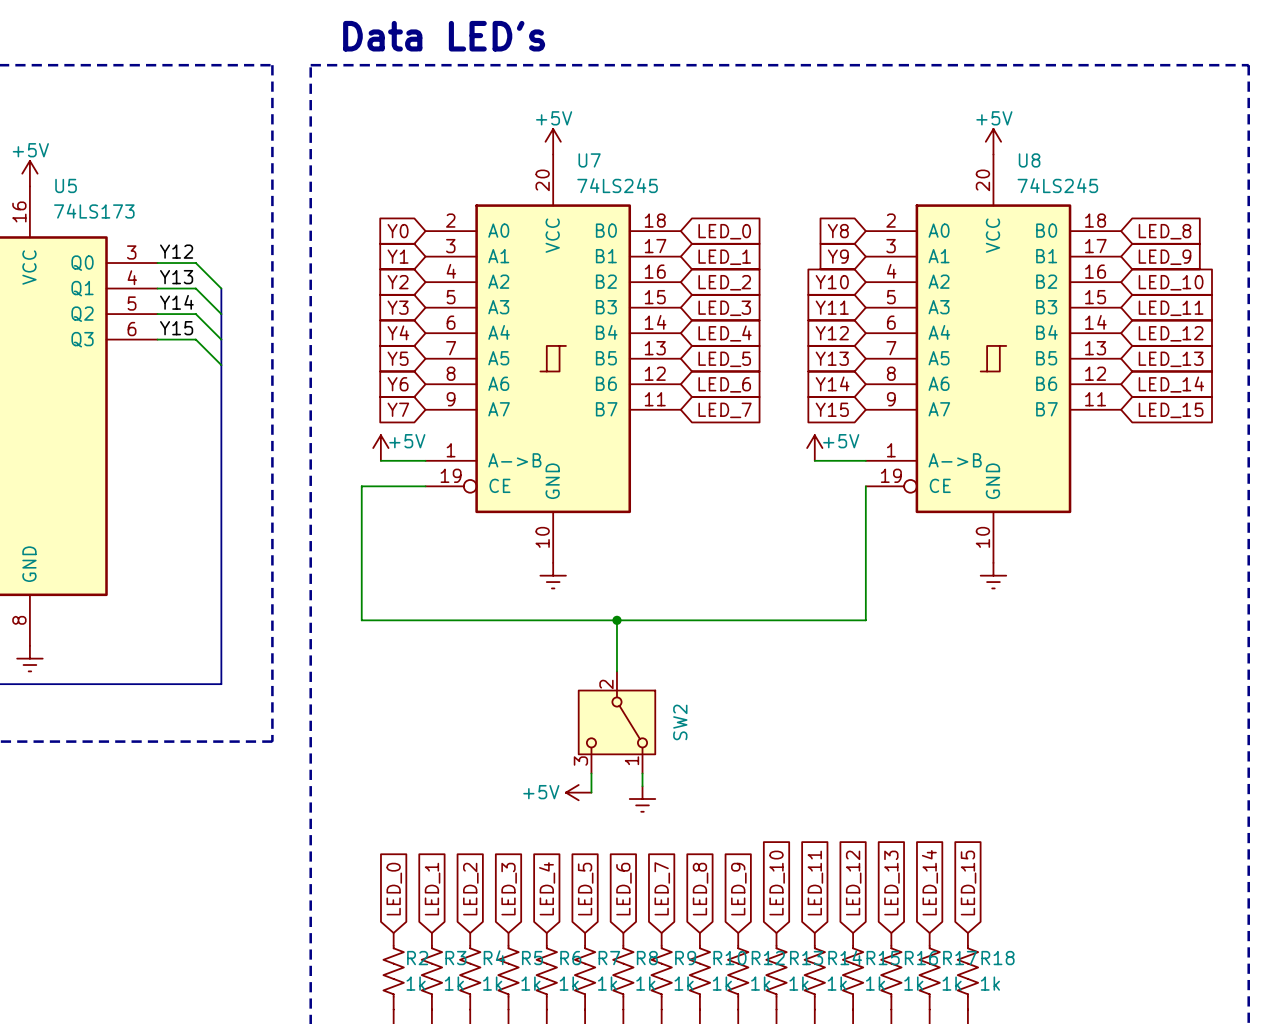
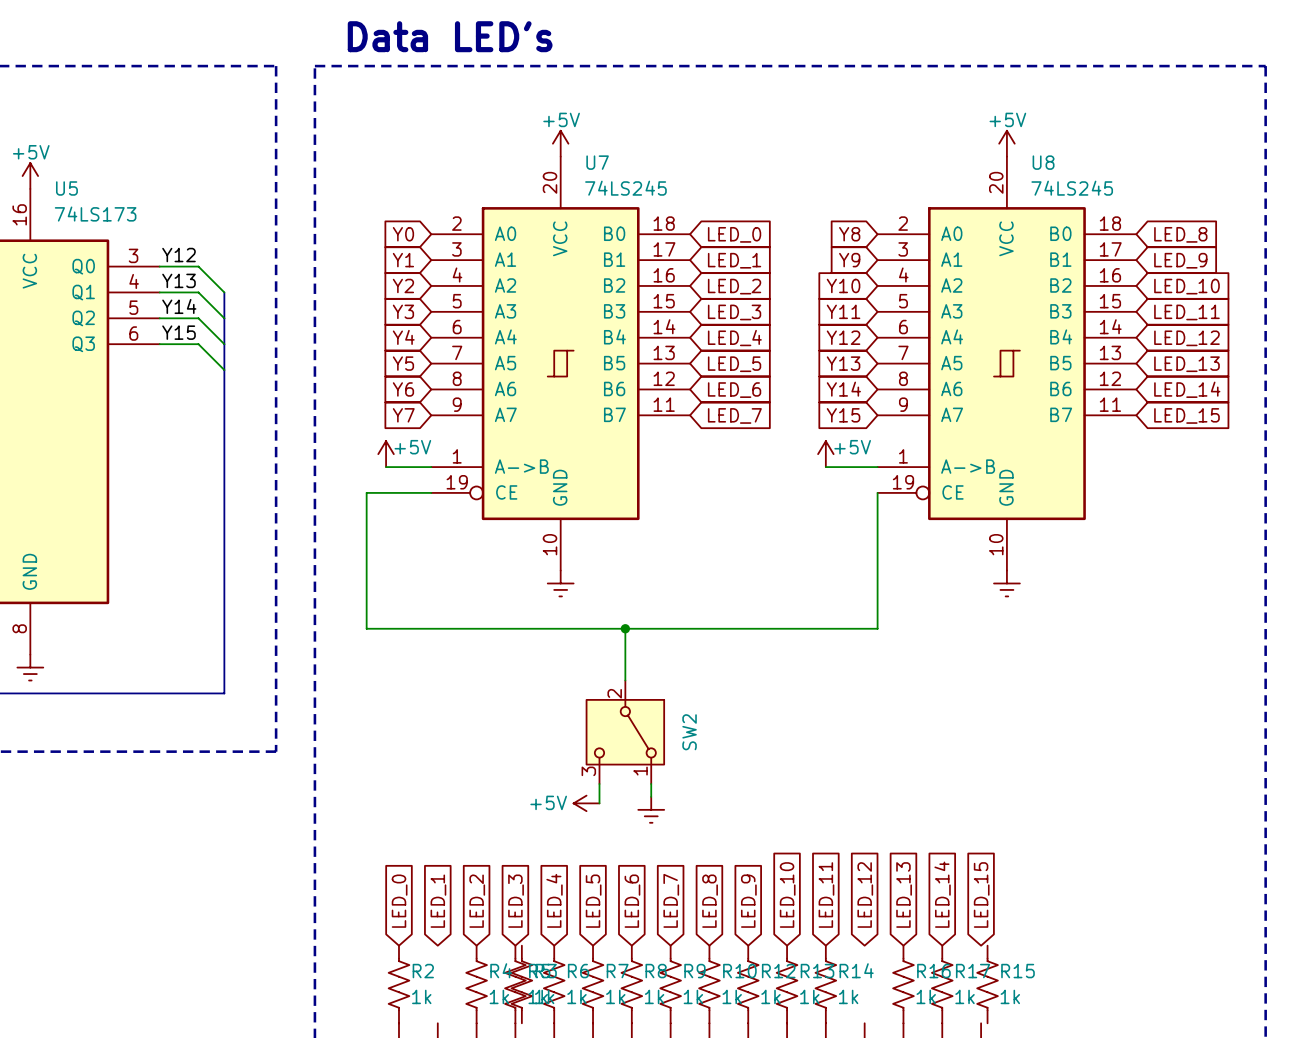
R3 position: (431, 971) -> (521, 984)
R15 position: (853, 971) -> (987, 984)
R18: 1k (967, 971) -> none

